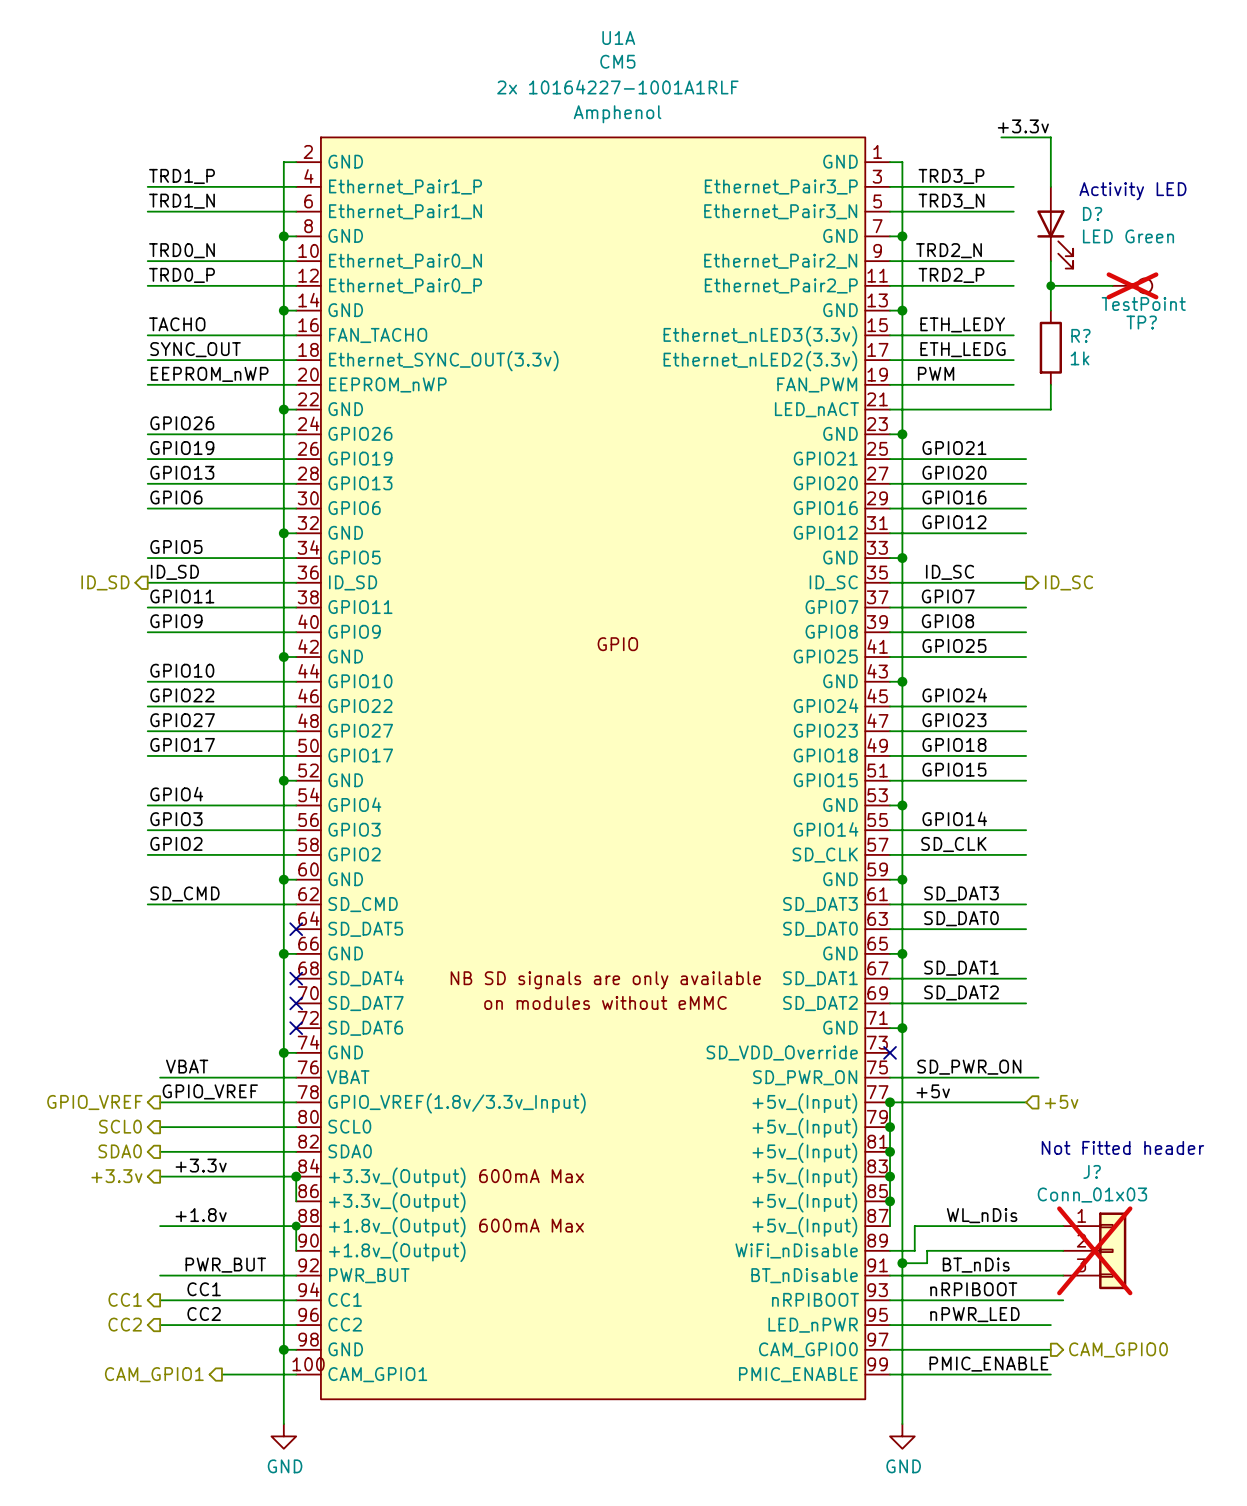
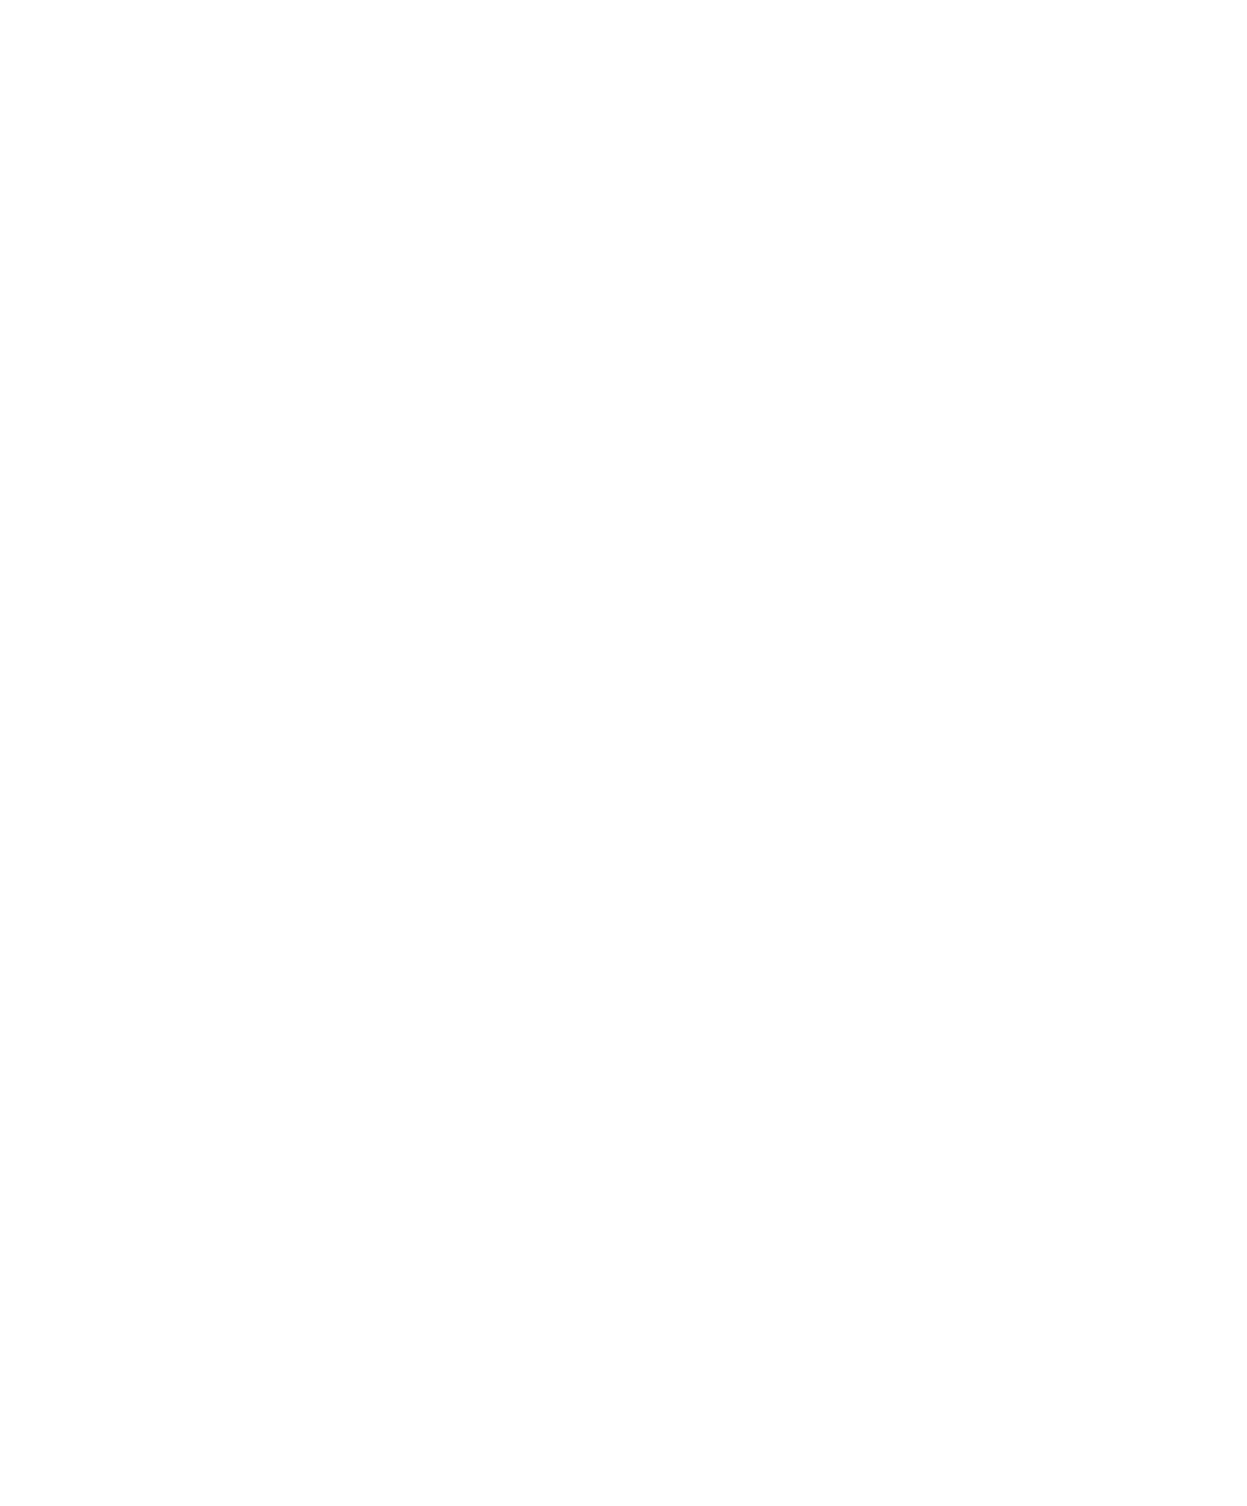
label: +3.3v (1023, 126) -> none
wire: (1001, 137) (1050, 137) (1050, 186) -> none
wire: (296, 162) (283, 162) (283, 1424) -> none
wire: (890, 162) (902, 162) (902, 1424) -> none
label: TRD1_P (182, 176) -> none
label: TRD3_P (951, 176) -> none
wire: (147, 186) (296, 186) -> none
wire: (890, 186) (1013, 186) -> none
text: Activity LED (1132, 191) -> none
label: TRD1_N (182, 201) -> none
label: TRD3_N (951, 201) -> none
wire: (147, 211) (296, 211) -> none
wire: (890, 211) (1013, 211) -> none
D?: LED Green (1055, 227) -> none
wire: (283, 236) (296, 236) -> none
junction: (283, 236) -> none
wire: (890, 236) (902, 236) -> none
junction: (902, 236) -> none
label: TRD0_N (182, 250) -> none
label: TRD2_N (949, 250) -> none
wire: (147, 261) (296, 261) -> none
wire: (890, 261) (1013, 261) -> none
wire: (1050, 261) (1050, 310) -> none
label: TRD0_P (182, 275) -> none
label: TRD2_P (951, 275) -> none
wire: (147, 285) (296, 285) -> none
wire: (890, 285) (1013, 285) -> none
wire: (1050, 285) (1112, 285) -> none
junction: (1050, 285) -> none
TP?: TestPoint (1132, 285) -> none
wire: (283, 310) (296, 310) -> none
junction: (283, 310) -> none
wire: (890, 310) (902, 310) -> none
junction: (902, 310) -> none
label: TACHO (177, 324) -> none
label: ETH_LEDY (962, 324) -> none
wire: (147, 335) (296, 335) -> none
wire: (890, 335) (1013, 335) -> none
R?: 1k (1050, 347) -> none
label: SYNC_OUT (195, 349) -> none
label: ETH_LEDG (962, 349) -> none
wire: (147, 360) (296, 360) -> none
wire: (890, 360) (1013, 360) -> none
label: PWM (936, 373) -> none
label: EEPROM_nWP (209, 374) -> none
wire: (147, 384) (296, 384) -> none
wire: (890, 384) (1013, 384) -> none
wire: (1050, 384) (1050, 409) (890, 409) -> none
wire: (283, 409) (296, 409) -> none
junction: (283, 409) -> none
label: GPIO26 (182, 423) -> none
wire: (147, 434) (296, 434) -> none
wire: (890, 434) (902, 434) -> none
junction: (902, 434) -> none
label: GPIO19 (182, 448) -> none
label: GPIO21 (954, 448) -> none
wire: (147, 459) (296, 459) -> none
wire: (890, 459) (1026, 459) -> none
label: GPIO13 (182, 472) -> none
label: GPIO20 (954, 472) -> none
wire: (147, 483) (296, 483) -> none
wire: (890, 483) (1026, 483) -> none
label: GPIO6 (176, 497) -> none
label: GPIO16 (954, 497) -> none
wire: (147, 508) (296, 508) -> none
wire: (890, 508) (1026, 508) -> none
label: GPIO12 (954, 522) -> none
wire: (283, 533) (296, 533) -> none
junction: (283, 533) -> none
wire: (890, 533) (1026, 533) -> none
label: GPIO5 (176, 547) -> none
wire: (147, 558) (296, 558) -> none
wire: (890, 558) (902, 558) -> none
junction: (902, 558) -> none
label: ID_SD (174, 572) -> none
label: ID_SC (950, 572) -> none
hierarchical label: ID_SD (105, 582) -> none
wire: (147, 582) (296, 582) -> none
wire: (890, 582) (1026, 582) -> none
hierarchical label: ID_SC (1069, 582) -> none
label: GPIO11 (182, 596) -> none
label: GPIO7 (948, 596) -> none
wire: (147, 607) (296, 607) -> none
wire: (890, 607) (1026, 607) -> none
label: GPIO9 (176, 621) -> none
label: GPIO8 (947, 621) -> none
wire: (147, 632) (296, 632) -> none
wire: (890, 632) (1026, 632) -> none
label: GPIO25 (954, 645) -> none
wire: (283, 657) (296, 657) -> none
junction: (283, 657) -> none
wire: (890, 657) (1026, 657) -> none
label: GPIO10 (182, 670) -> none
wire: (147, 681) (296, 681) -> none
wire: (890, 681) (902, 681) -> none
junction: (902, 681) -> none
label: GPIO22 (182, 695) -> none
label: GPIO24 (954, 695) -> none
wire: (147, 706) (296, 706) -> none
wire: (890, 706) (1026, 706) -> none
label: GPIO27 (182, 720) -> none
label: GPIO23 (954, 720) -> none
wire: (147, 731) (296, 731) -> none
wire: (890, 731) (1026, 731) -> none
label: GPIO17 (182, 744) -> none
label: GPIO18 (954, 744) -> none
wire: (147, 755) (296, 755) -> none
wire: (890, 755) (1026, 755) -> none
U1A: CM5 (593, 768) -> none
label: GPIO15 (954, 769) -> none
wire: (283, 780) (296, 780) -> none
junction: (283, 780) -> none
wire: (890, 780) (1026, 780) -> none
label: GPIO4 (176, 794) -> none
wire: (147, 805) (296, 805) -> none
wire: (890, 805) (902, 805) -> none
junction: (902, 805) -> none
label: GPIO14 (954, 818) -> none
label: GPIO3 (176, 819) -> none
wire: (147, 830) (296, 830) -> none
wire: (890, 830) (1026, 830) -> none
label: GPIO2 (176, 843) -> none
label: SD_CLK (953, 844) -> none
wire: (147, 854) (296, 854) -> none
wire: (890, 854) (1026, 854) -> none
wire: (283, 879) (296, 879) -> none
junction: (283, 879) -> none
wire: (890, 879) (902, 879) -> none
junction: (902, 879) -> none
label: SD_CMD (184, 893) -> none
label: SD_DAT3 (961, 893) -> none
wire: (147, 904) (296, 904) -> none
wire: (890, 904) (1026, 904) -> none
label: SD_DAT0 (961, 918) -> none
no-connect mark: (296, 929) -> none
wire: (890, 929) (1026, 929) -> none
wire: (283, 953) (296, 953) -> none
junction: (283, 953) -> none
wire: (890, 953) (902, 953) -> none
junction: (902, 953) -> none
label: SD_DAT1 (961, 968) -> none
no-connect mark: (296, 978) -> none
wire: (890, 978) (1026, 978) -> none
label: SD_DAT2 (961, 992) -> none
no-connect mark: (296, 1003) -> none
wire: (890, 1003) (1026, 1003) -> none
no-connect mark: (296, 1028) -> none
wire: (890, 1028) (902, 1028) -> none
junction: (902, 1028) -> none
wire: (283, 1052) (296, 1052) -> none
junction: (283, 1052) -> none
no-connect mark: (890, 1052) -> none
label: VBAT (187, 1066) -> none
label: SD_PWR_ON (969, 1067) -> none
wire: (160, 1077) (296, 1077) -> none
wire: (890, 1077) (1038, 1077) -> none
label: GPIO_VREF (210, 1091) -> none
label: +5v (933, 1091) -> none
hierarchical label: +5v (1061, 1101) -> none
hierarchical label: GPIO_VREF (94, 1102) -> none
wire: (160, 1102) (296, 1102) -> none
junction: (890, 1102) -> none
wire: (1026, 1102) (890, 1102) (890, 1226) -> none
hierarchical label: SCL0 (120, 1126) -> none
wire: (160, 1127) (296, 1127) -> none
junction: (890, 1127) -> none
text: Not Fitted header (1122, 1147) -> none
hierarchical label: SDA0 (120, 1151) -> none
wire: (160, 1151) (296, 1151) -> none
junction: (890, 1151) -> none
label: +3.3v (201, 1165) -> none
hierarchical label: +3.3v (116, 1176) -> none
wire: (160, 1176) (296, 1176) (296, 1201) -> none
junction: (296, 1176) -> none
junction: (890, 1176) -> none
junction: (890, 1201) -> none
label: +1.8v (201, 1215) -> none
label: WL_nDis (982, 1215) -> none
wire: (160, 1226) (296, 1226) (296, 1250) -> none
junction: (296, 1226) -> none
wire: (1063, 1226) (914, 1226) (914, 1250) (890, 1250) -> none
wire: (1063, 1250) (927, 1250) (927, 1263) (902, 1263) -> none
J?: Conn_01x03 (1094, 1250) -> none
junction: (902, 1263) -> none
label: PWR_BUT (225, 1265) -> none
label: BT_nDis (976, 1265) -> none
wire: (160, 1275) (296, 1275) -> none
wire: (890, 1275) (1063, 1275) -> none
label: CC1 (204, 1289) -> none
label: nRPIBOOT (973, 1289) -> none
hierarchical label: CC1 (125, 1299) -> none
wire: (160, 1300) (296, 1300) -> none
wire: (890, 1300) (1063, 1300) -> none
label: CC2 (204, 1314) -> none
label: nPWR_LED (974, 1314) -> none
hierarchical label: CC2 (125, 1324) -> none
wire: (160, 1325) (296, 1325) -> none
wire: (890, 1325) (1050, 1325) -> none
wire: (283, 1349) (296, 1349) -> none
junction: (283, 1349) -> none
wire: (890, 1349) (1050, 1349) -> none
hierarchical label: CAM_GPIO0 (1118, 1349) -> none
label: PMIC_ENABLE (988, 1364) -> none
hierarchical label: CAM_GPIO1 (154, 1374) -> none
wire: (221, 1374) (296, 1374) -> none
wire: (890, 1374) (1050, 1374) -> none
power symbol: GND (283, 1436) -> none
power symbol: GND (902, 1436) -> none

